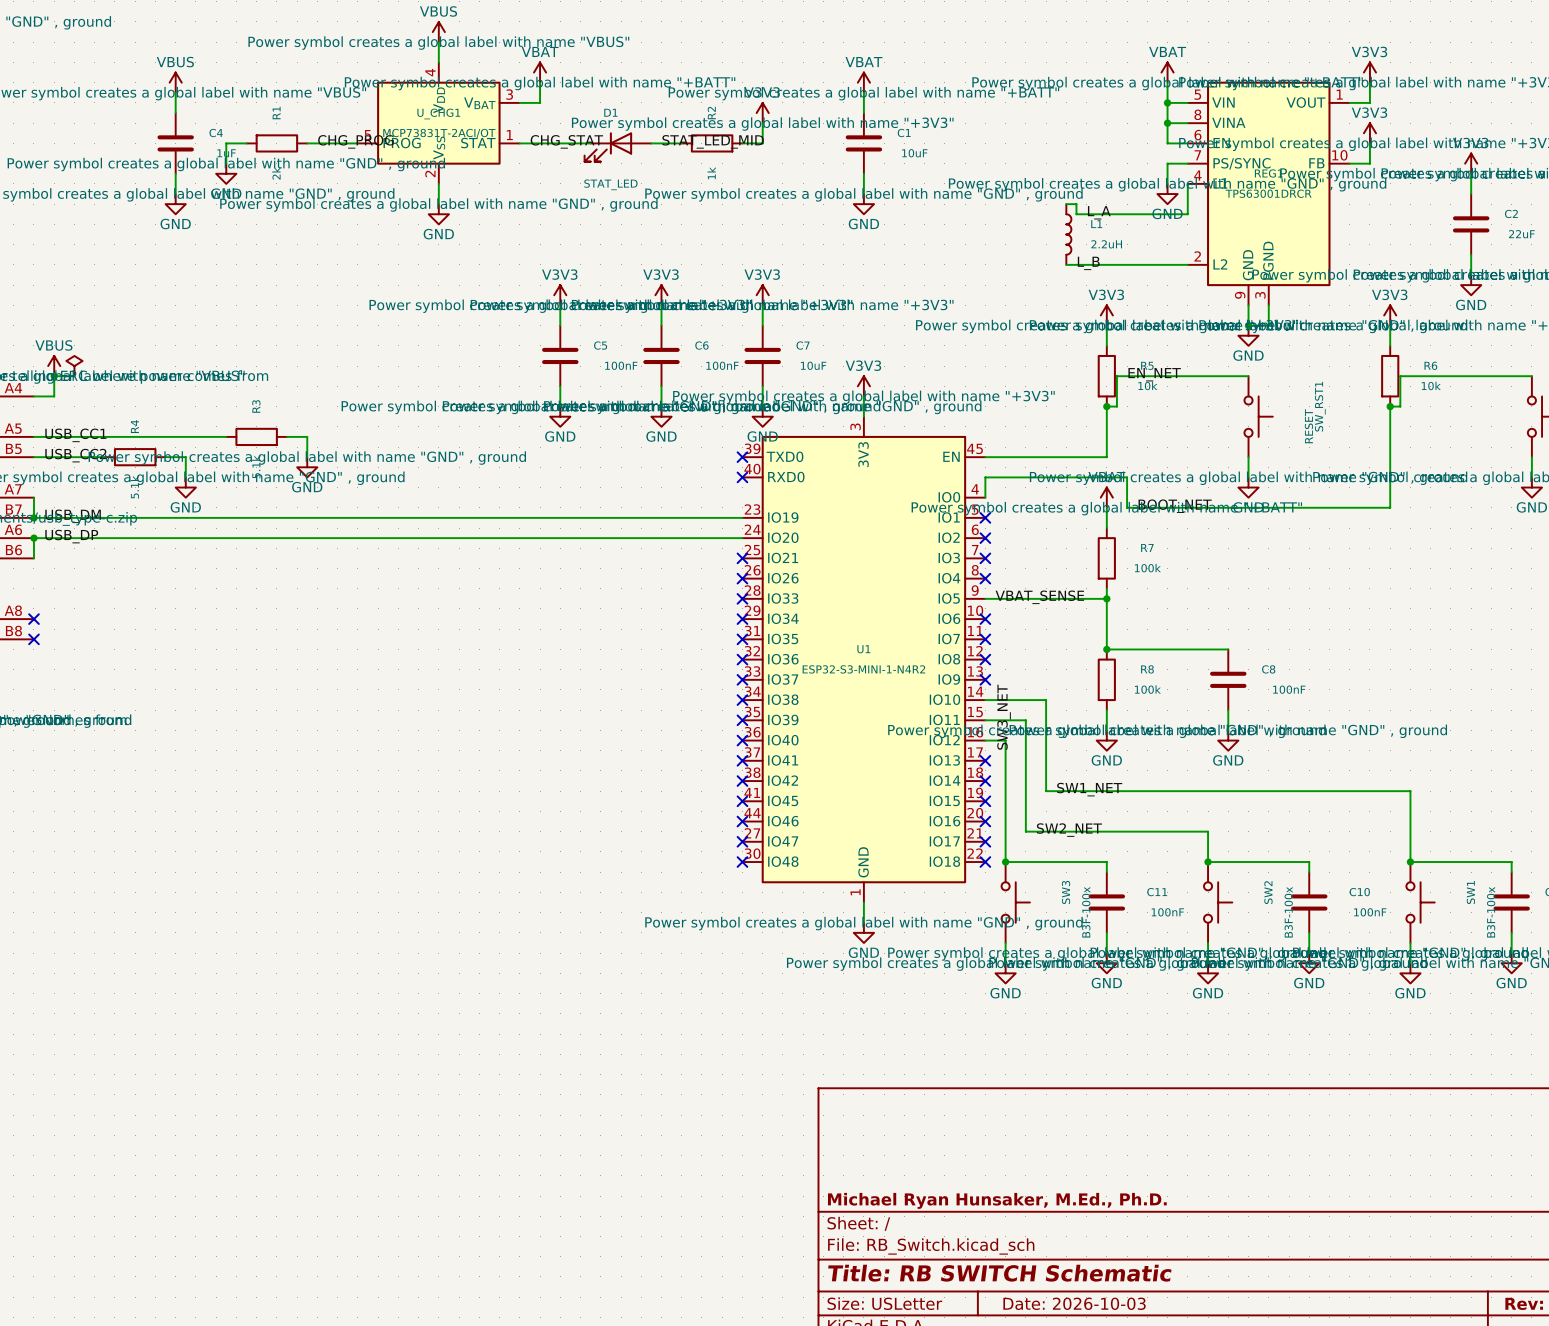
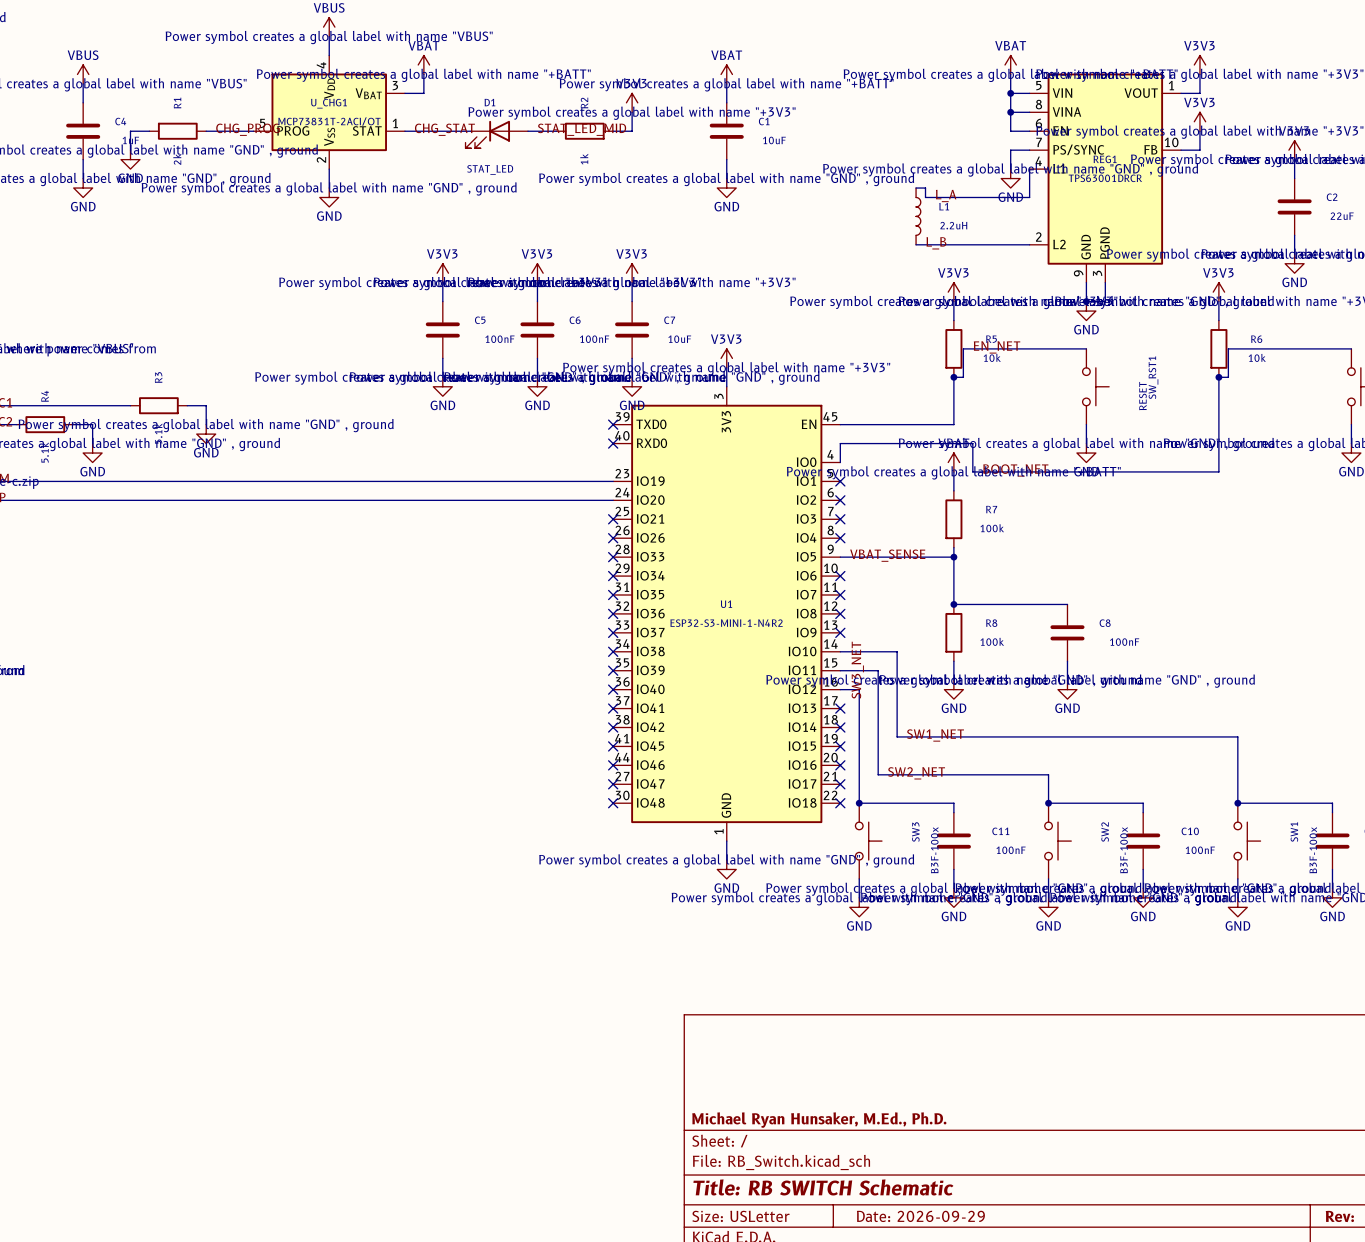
title block: Date: 2026-10-03 (1074, 1303) -> Date: 2026-09-29 (920, 1216)

